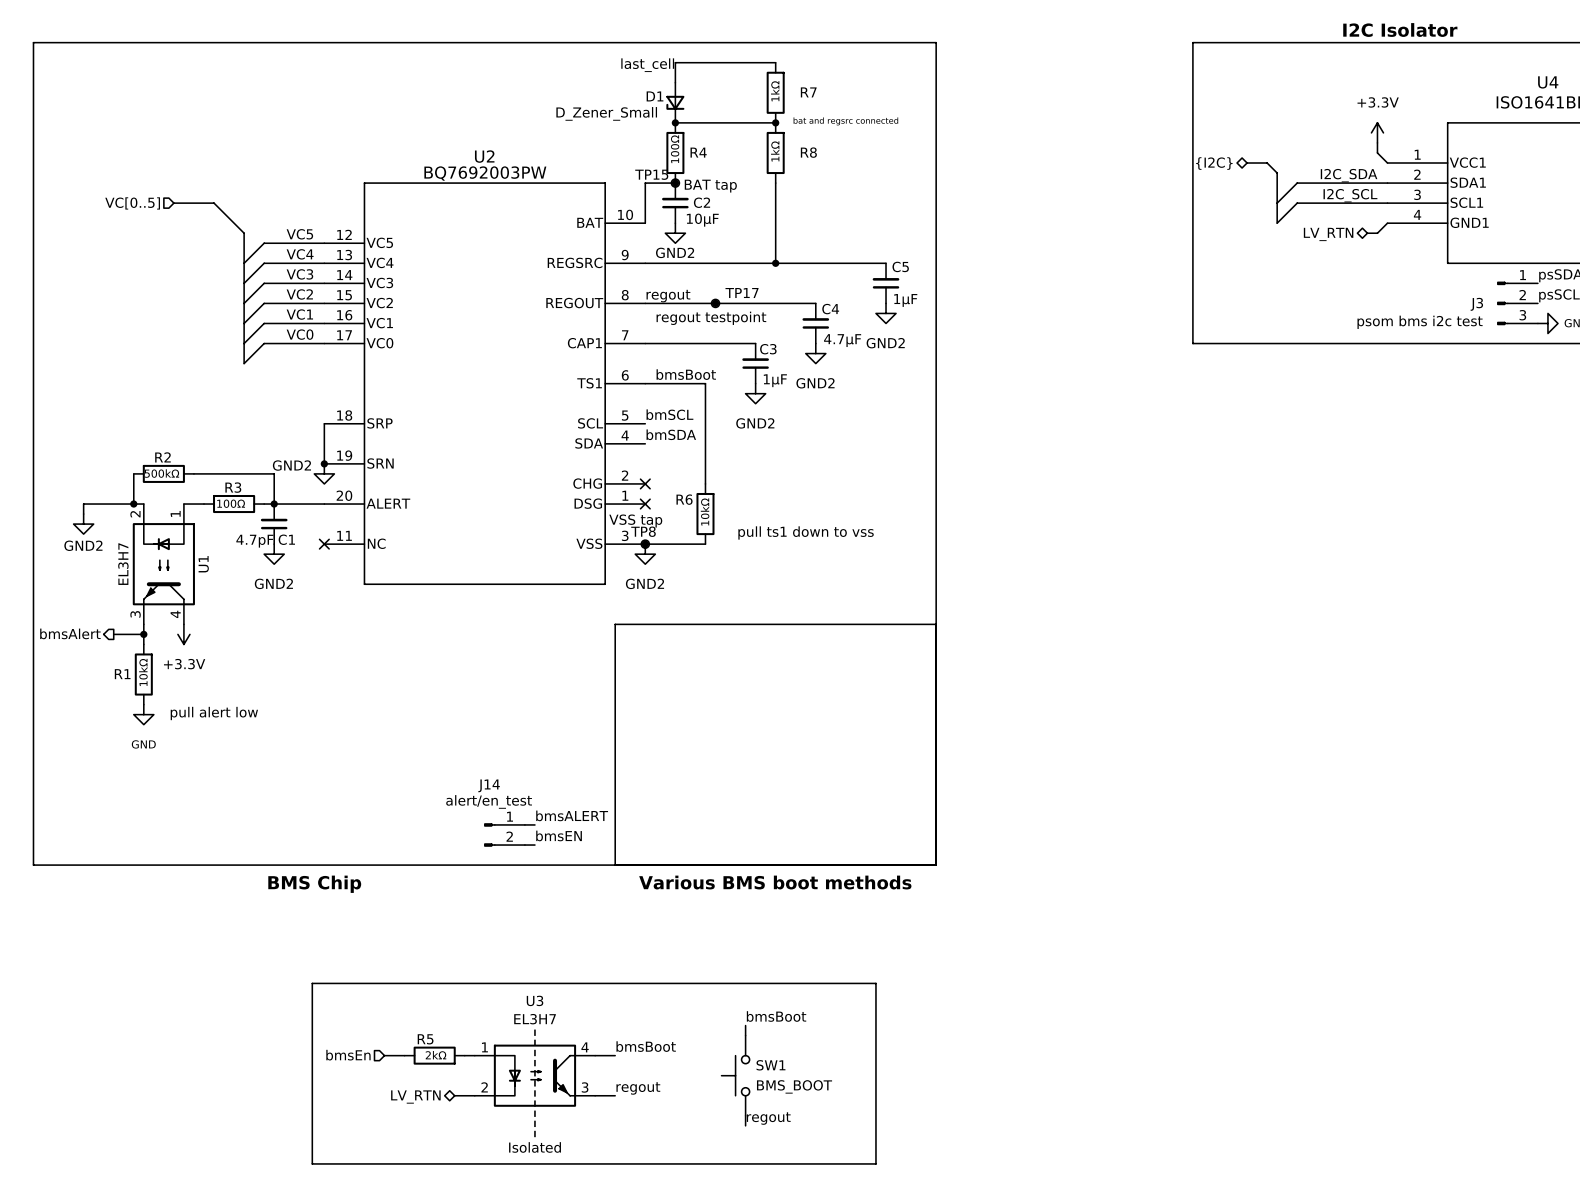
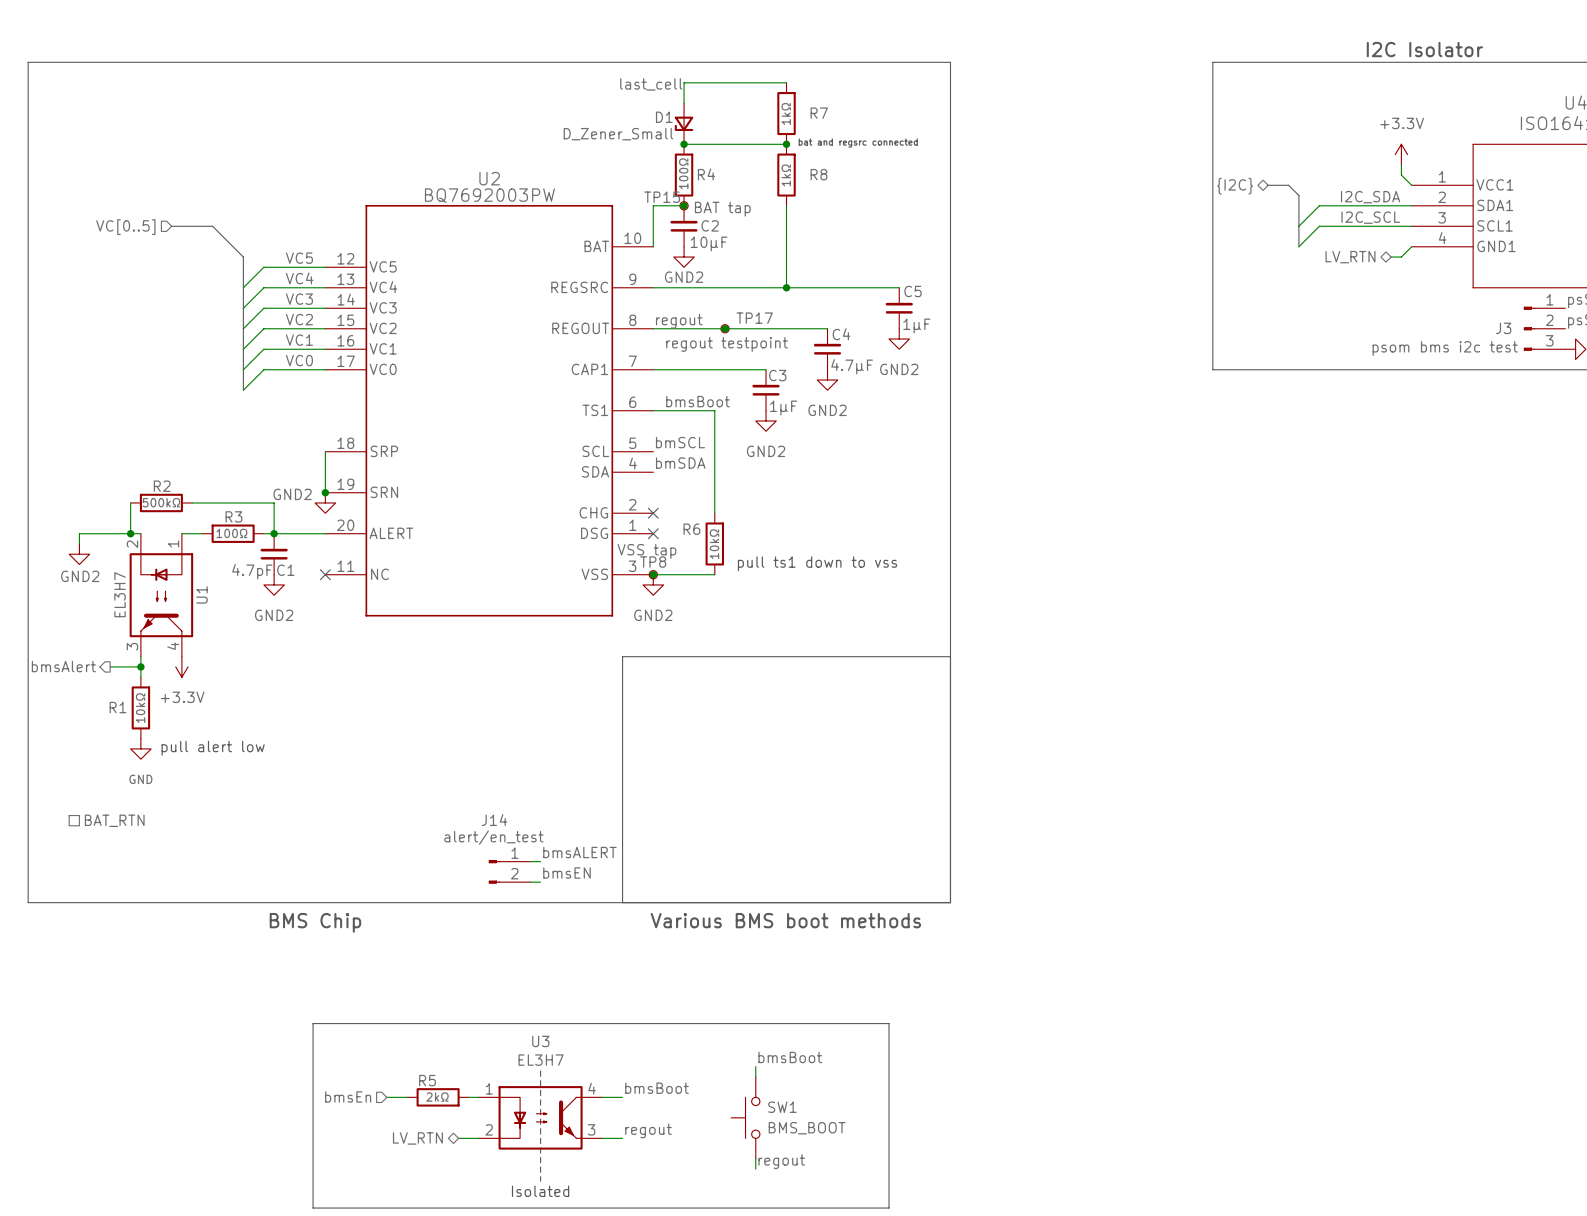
hierarchical label: none -> BAT_RTN (114, 820)

